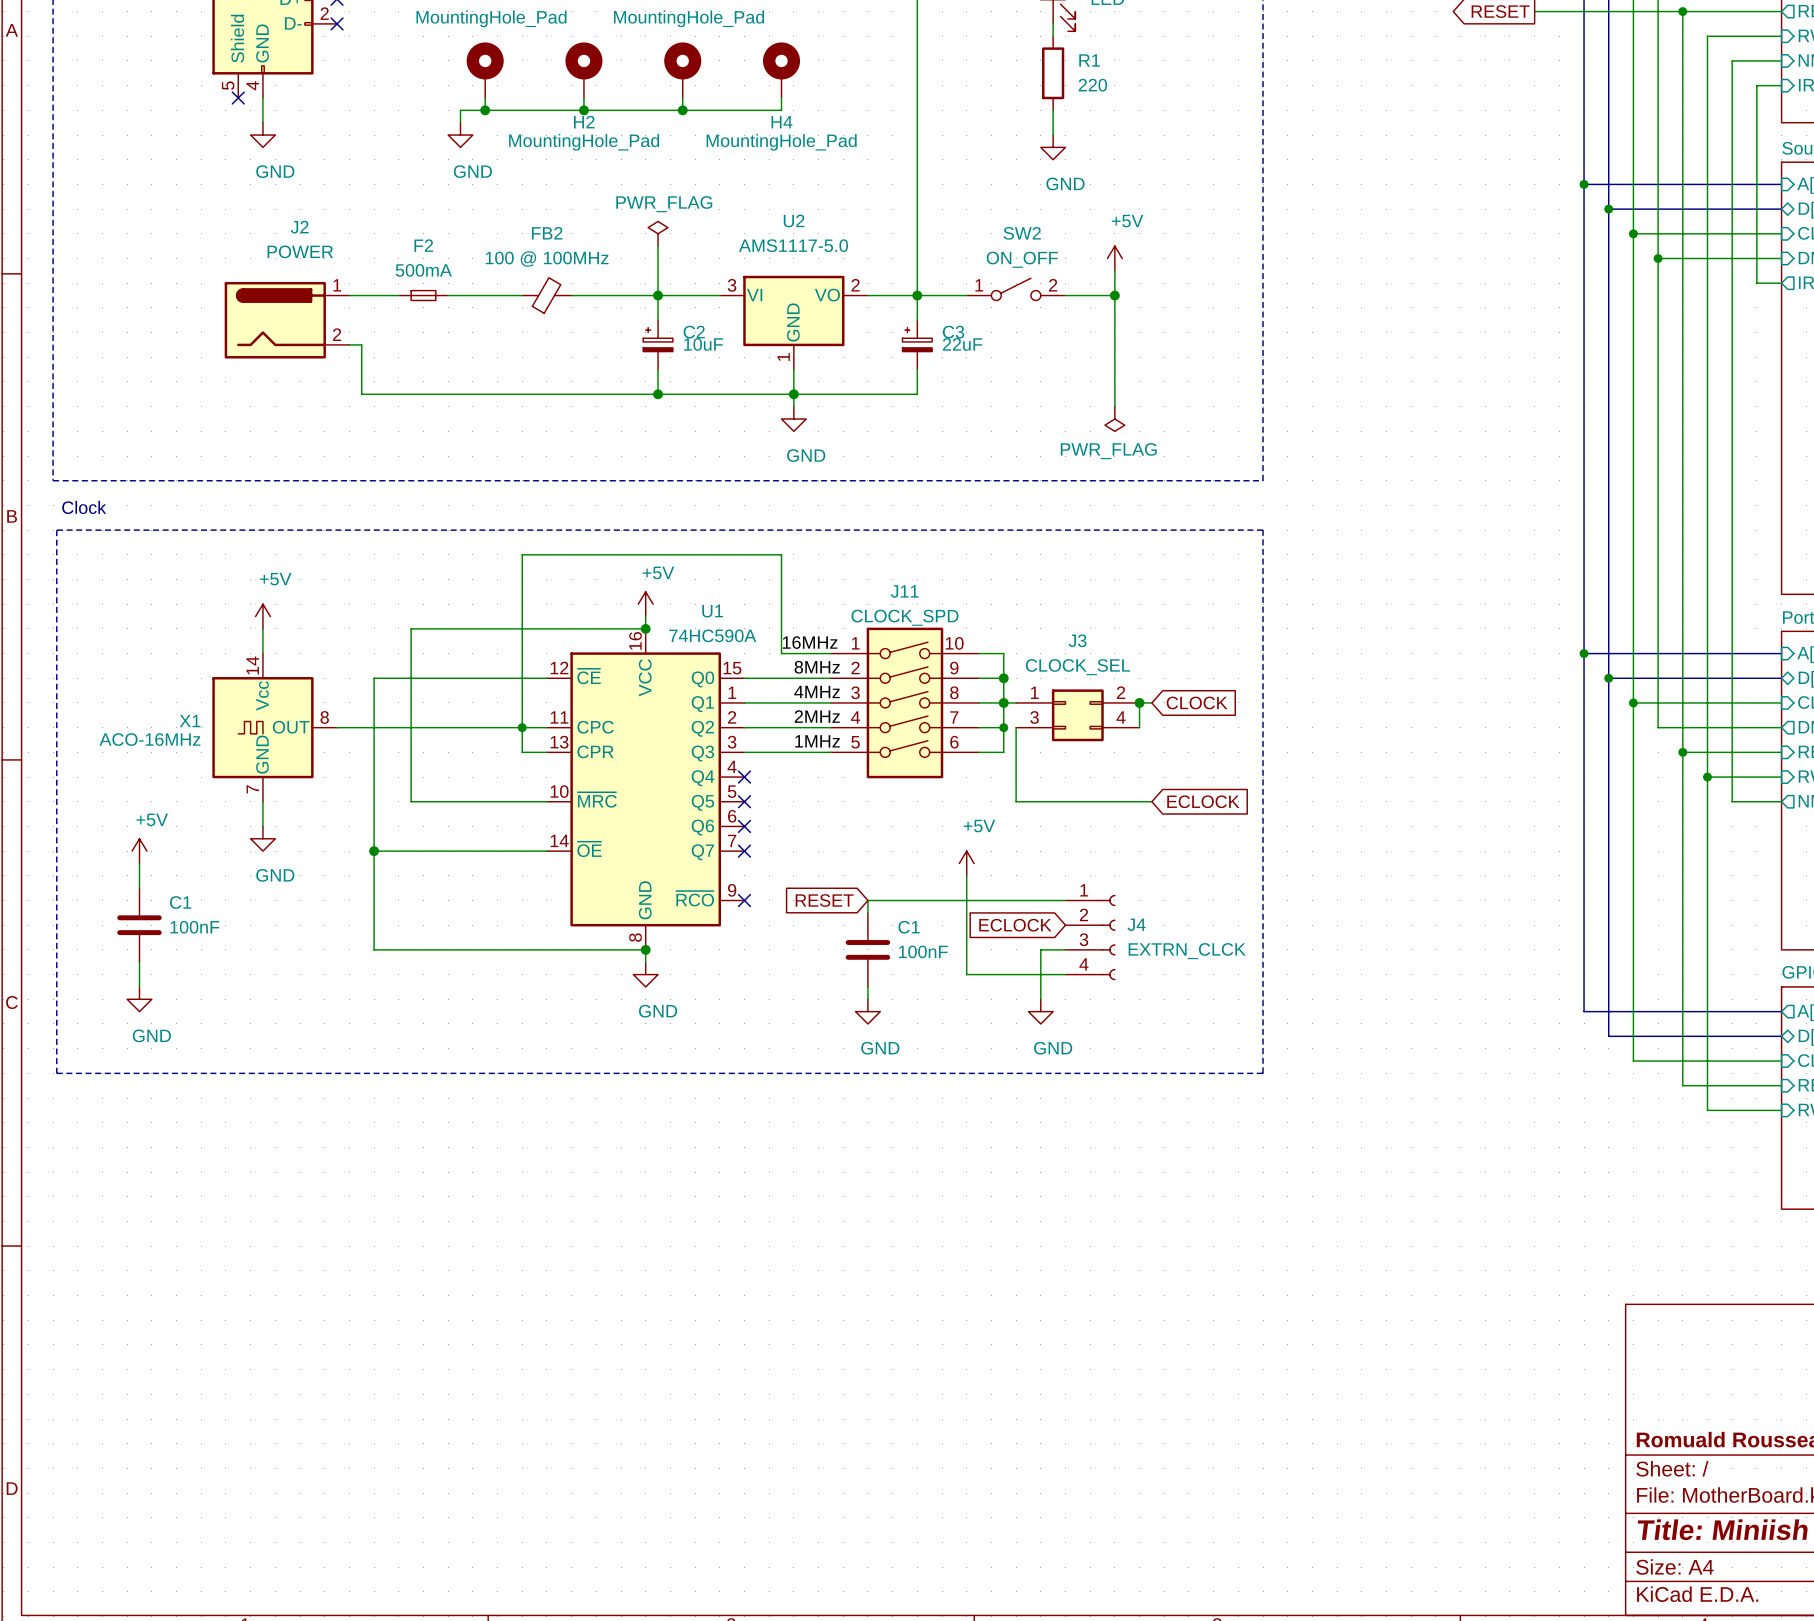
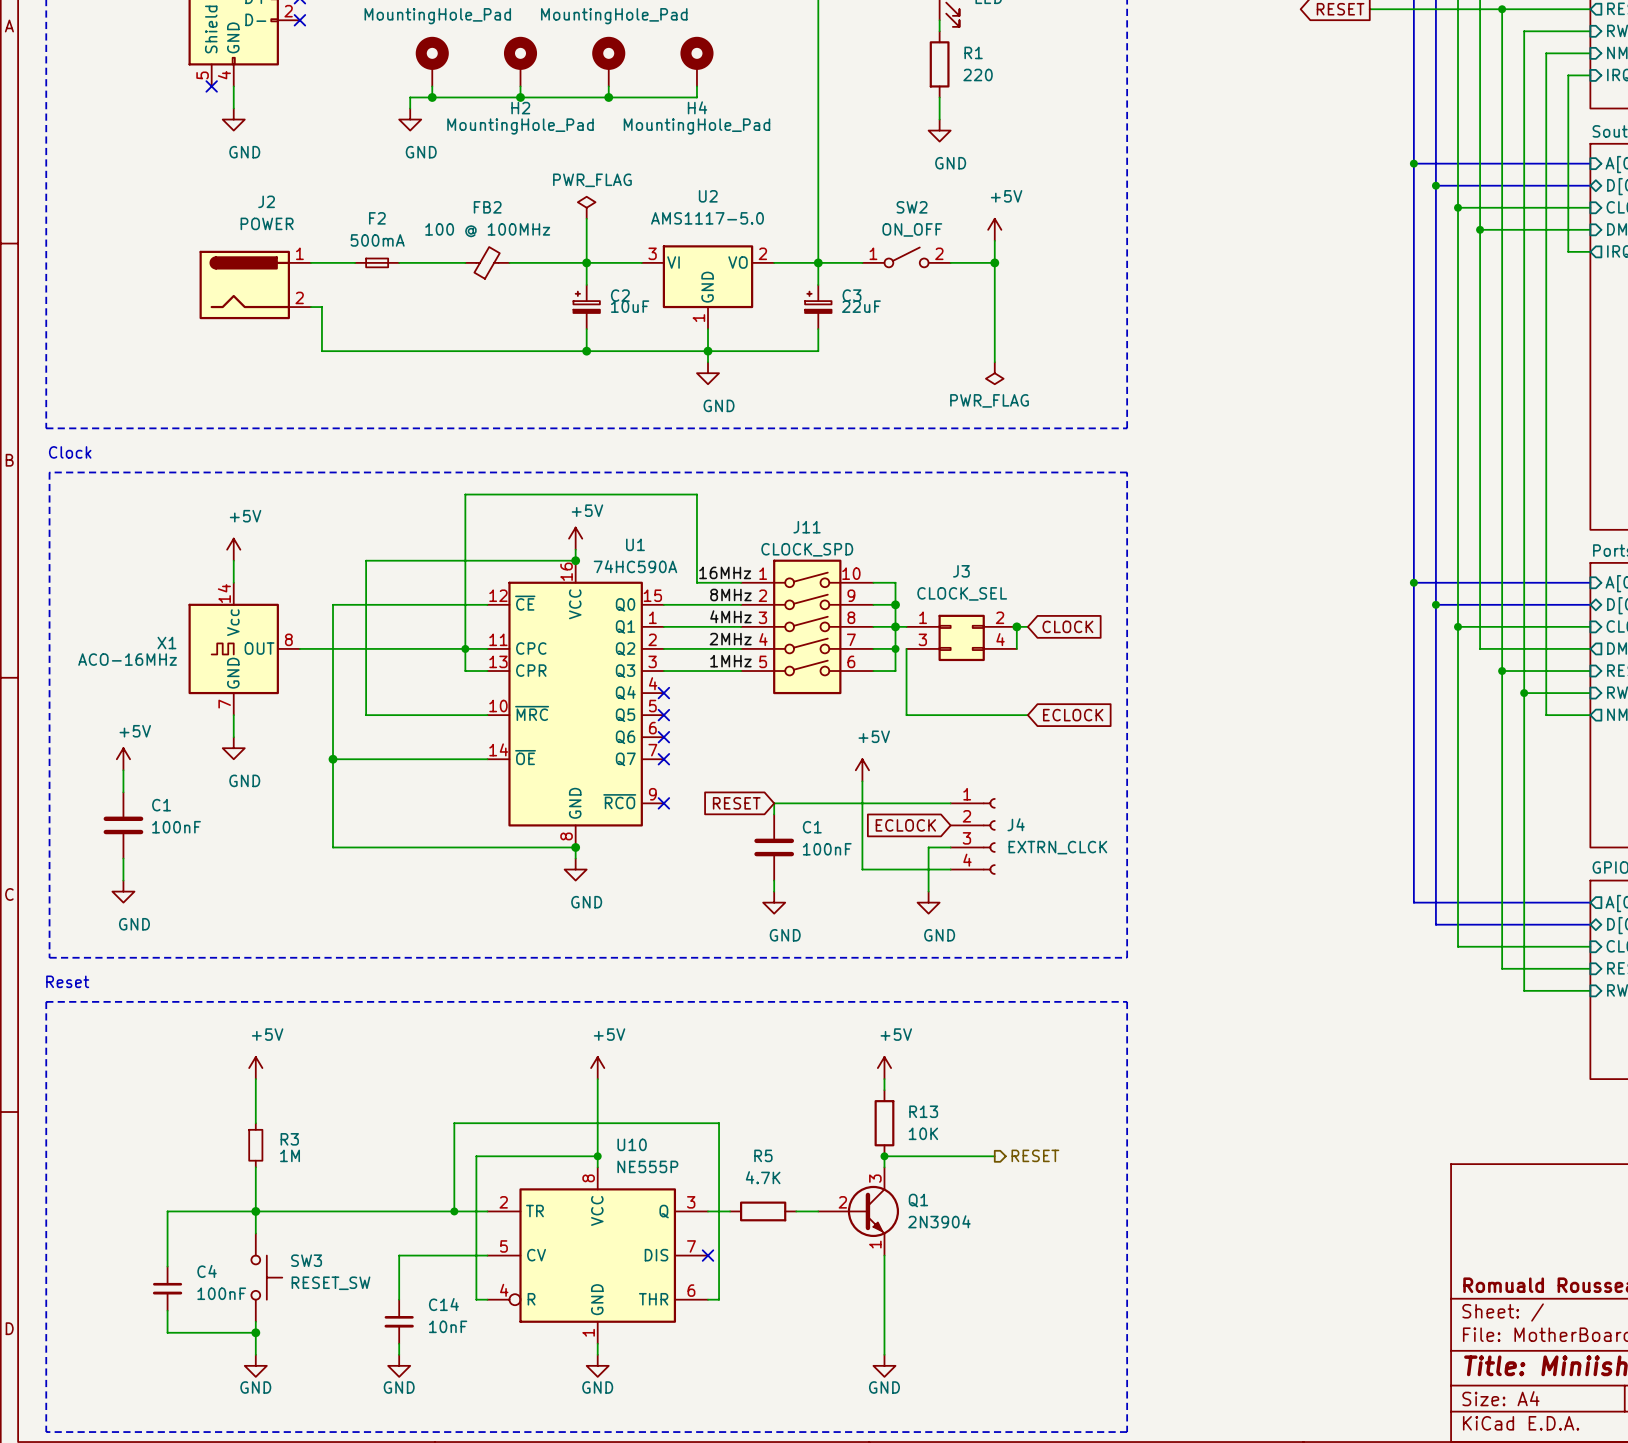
text: none -> Reset (67, 981)
line: none -> (46, 1001) (46, 1432) (1127, 1432) (1127, 1001) (46, 1001)
power symbol: none -> +5V (255, 1068)
power symbol: none -> +5V (597, 1068)
power symbol: none -> +5V (884, 1068)
wire: none -> (255, 1079) (255, 1123)
wire: none -> (597, 1079) (597, 1167)
wire: none -> (884, 1079) (884, 1090)
R13: none -> 10K (884, 1123)
R3: none -> 1M (255, 1145)
wire: none -> (597, 1156) (476, 1156) (476, 1299) (487, 1299)
junction: none -> (597, 1156)
junction: none -> (884, 1156)
wire: none -> (994, 1156) (884, 1156) (884, 1167)
hierarchical label: none -> RESET (1035, 1155)
wire: none -> (255, 1167) (255, 1233)
junction: none -> (255, 1211)
wire: none -> (454, 1211) (454, 1123) (719, 1123) (719, 1299) (708, 1299)
junction: none -> (454, 1211)
wire: none -> (487, 1211) (167, 1211) (167, 1266)
wire: none -> (708, 1211) (730, 1211)
R5: none -> 4.7K (763, 1211)
wire: none -> (796, 1211) (818, 1211)
Q1: none -> 2N3904 (858, 1211)
wire: none -> (487, 1255) (399, 1255) (399, 1299)
U10: none -> NE555P (597, 1255)
no-connect mark: none -> (708, 1255)
wire: none -> (884, 1255) (884, 1354)
SW3: none -> RESET_SW (266, 1277)
C4: none -> 100nF (167, 1288)
wire: none -> (167, 1310) (167, 1332) (255, 1332)
wire: none -> (255, 1321) (255, 1354)
C14: none -> 10nF (399, 1321)
junction: none -> (255, 1332)
wire: none -> (399, 1343) (399, 1354)
wire: none -> (597, 1343) (597, 1354)
power symbol: none -> GND (255, 1365)
power symbol: none -> GND (399, 1365)
power symbol: none -> GND (597, 1365)
power symbol: none -> GND (884, 1365)

